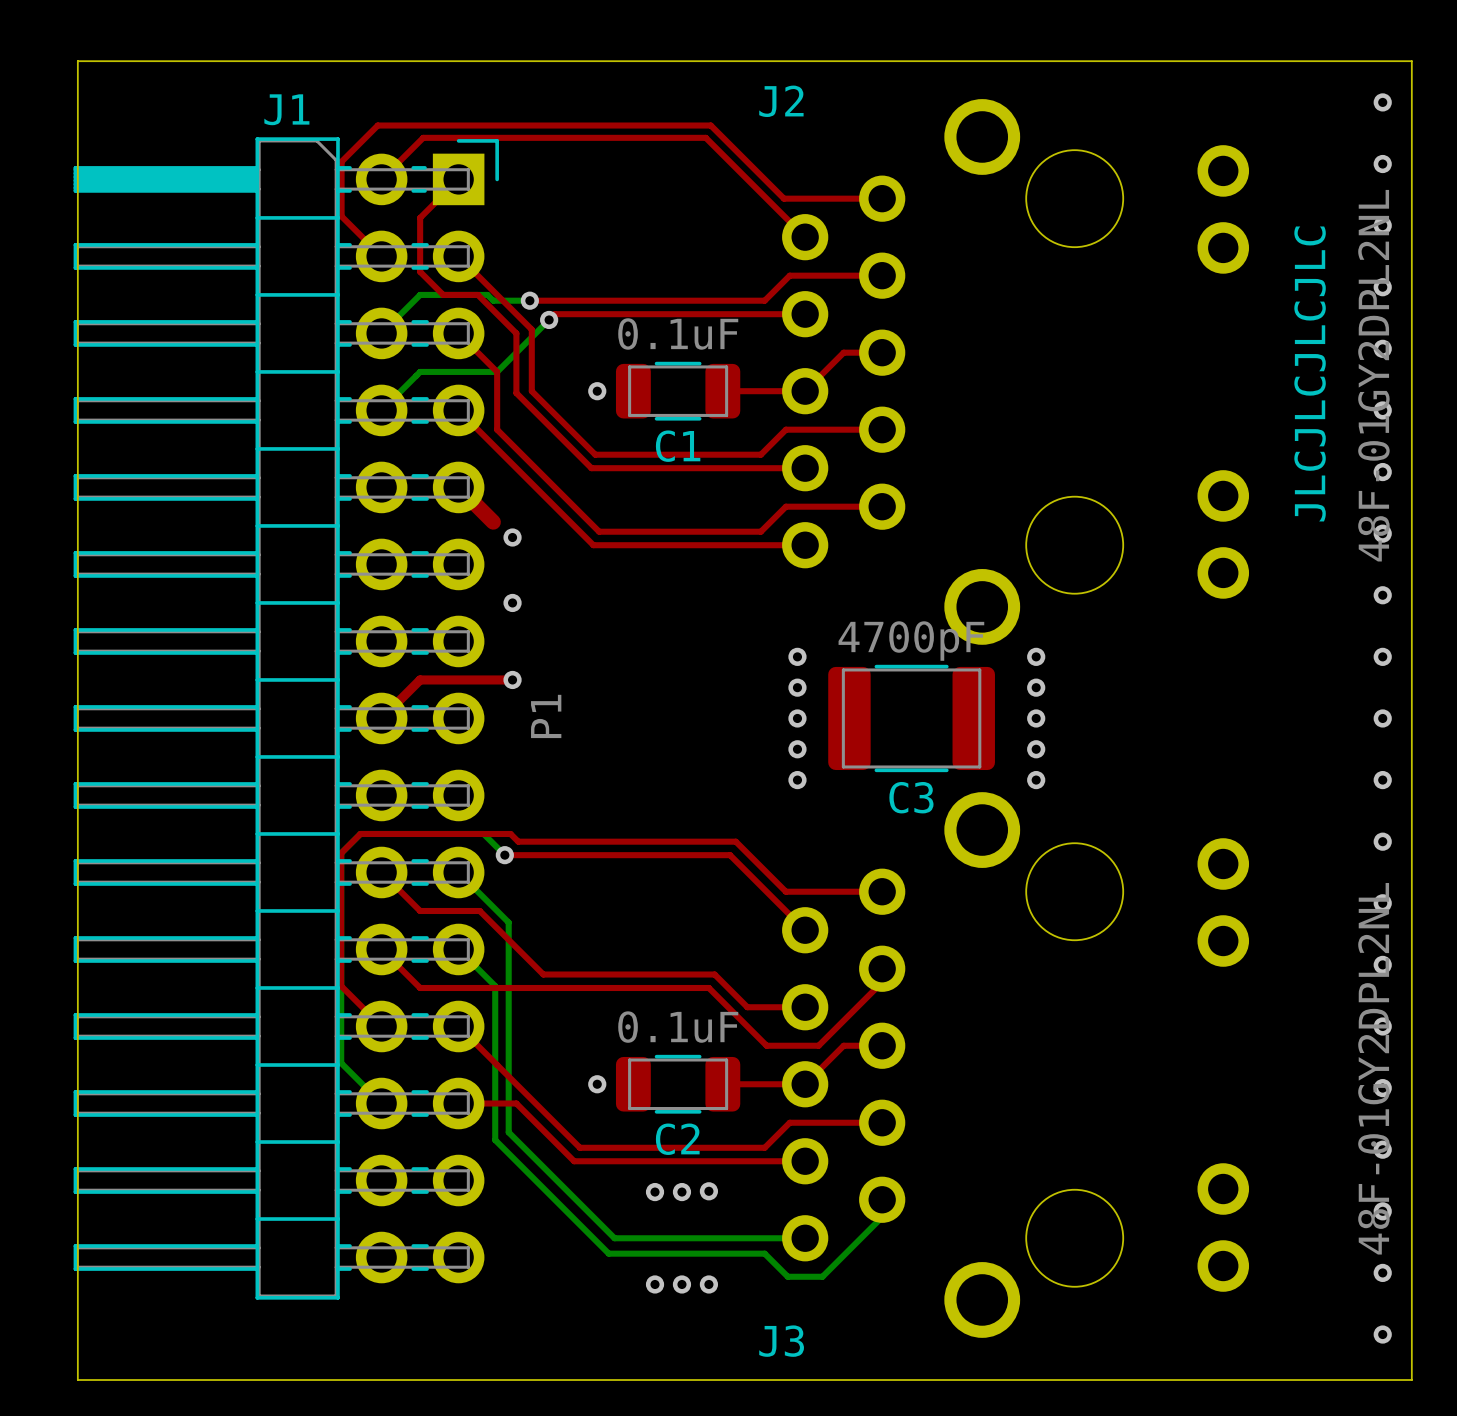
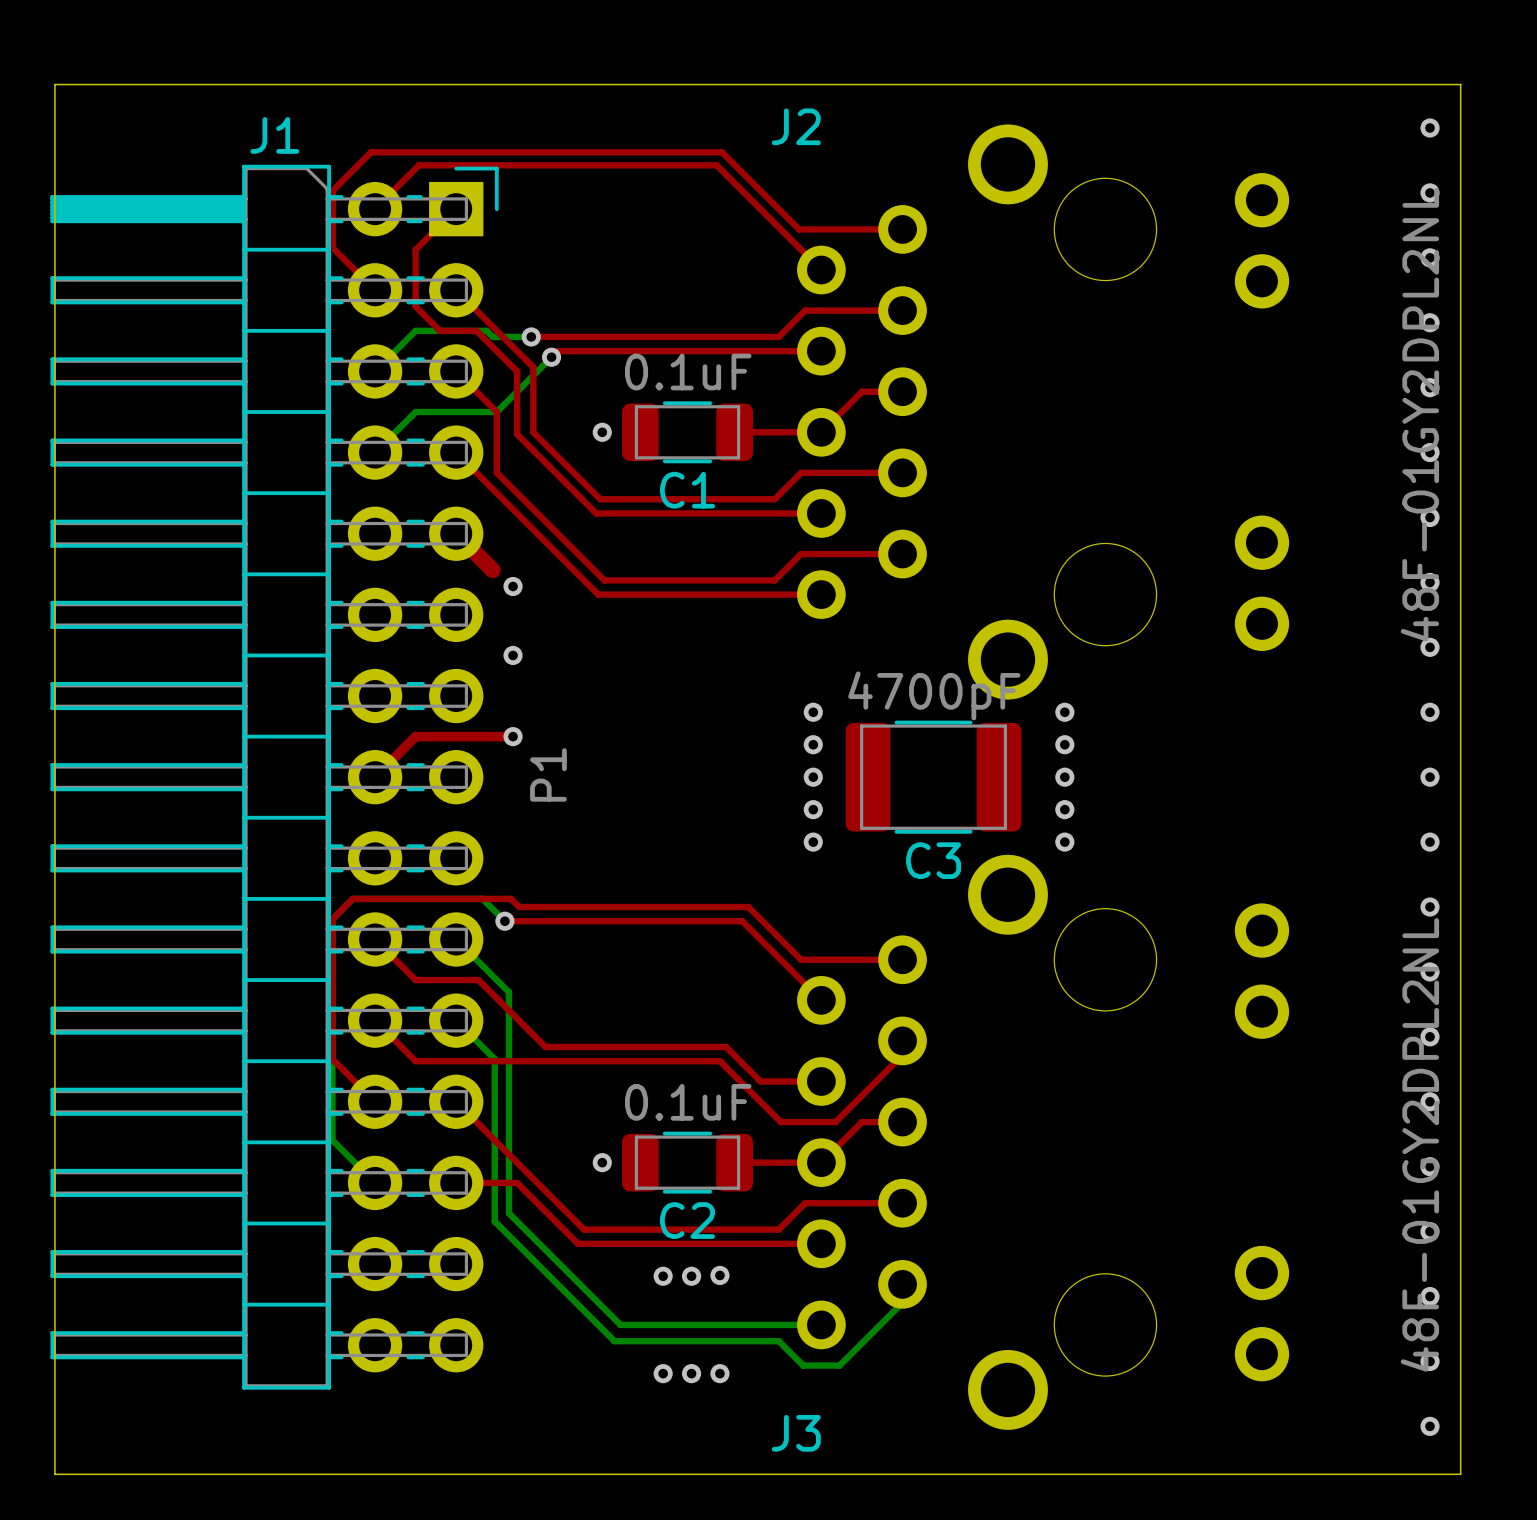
text: JLCJLCJLCJLC (1310, 373) -> none

